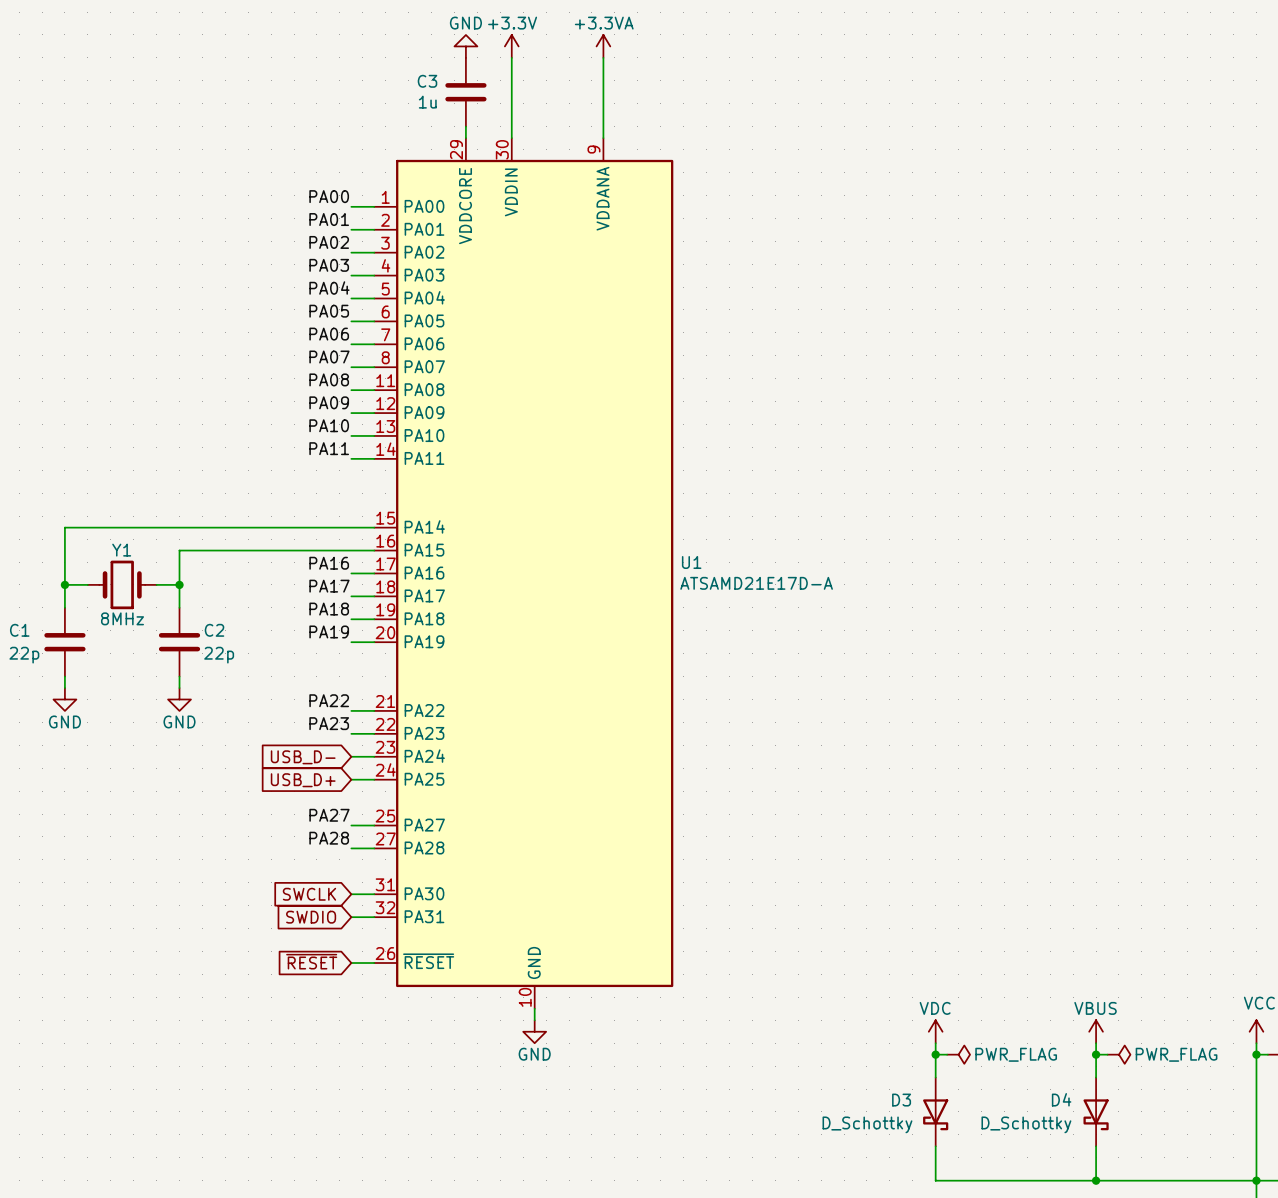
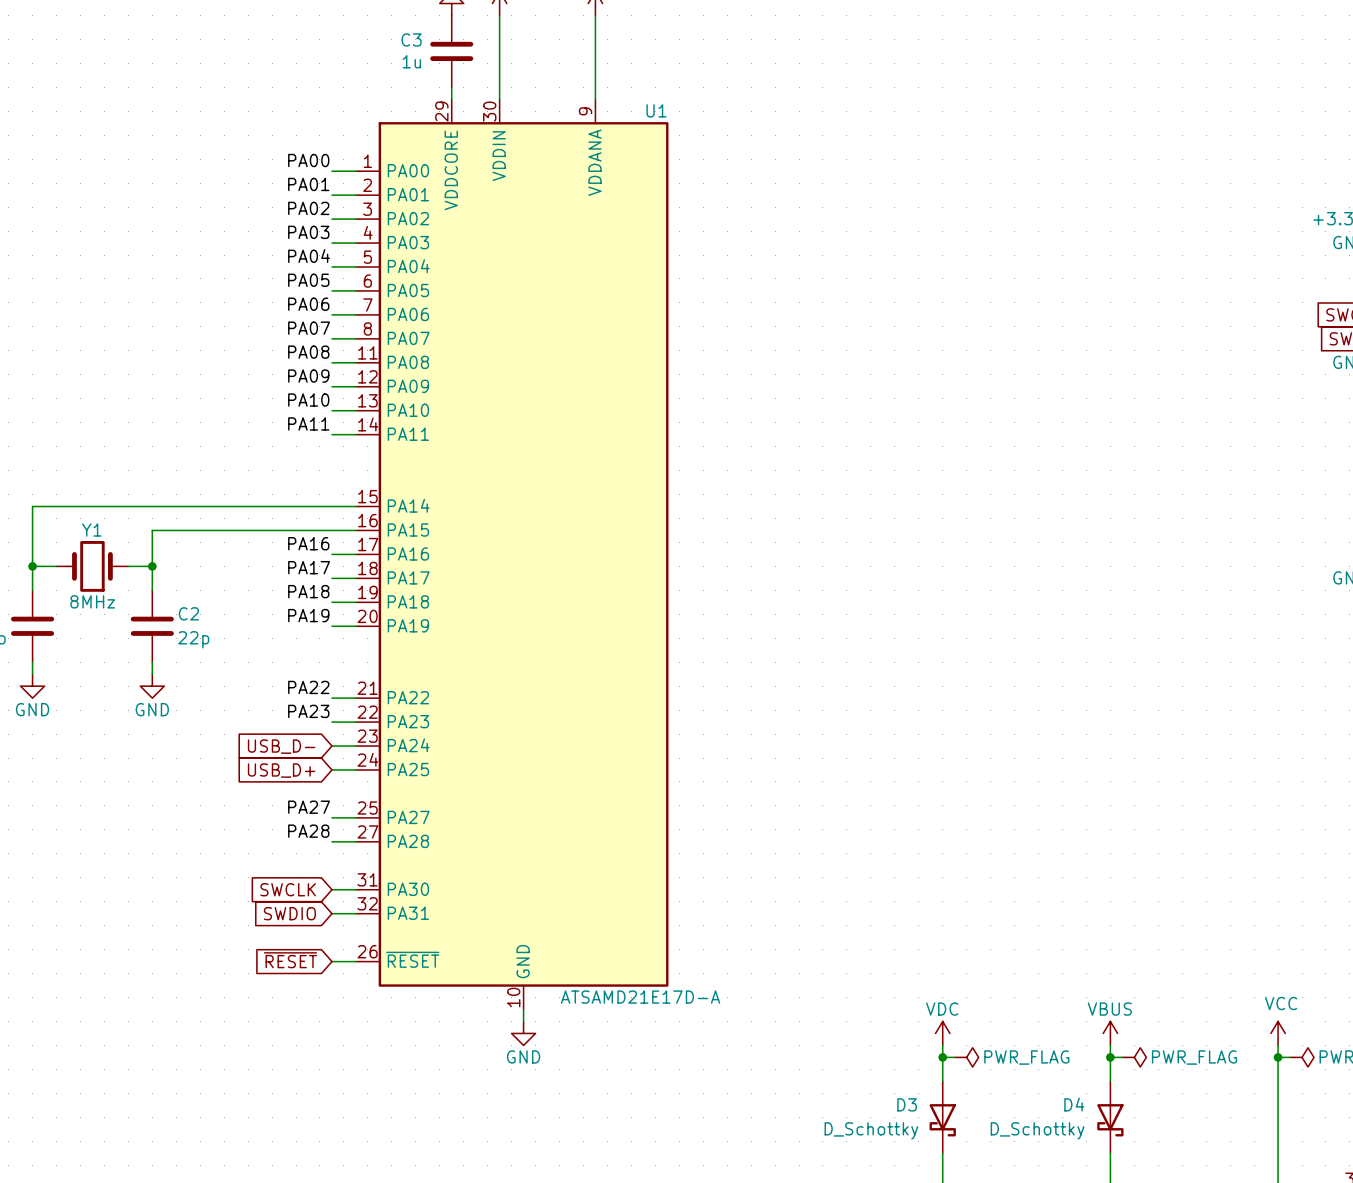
U1 name position: U1 (691, 562) -> U1 (656, 110)
U1 value position: ATSAMD21E17D-A (756, 583) -> ATSAMD21E17D-A (640, 997)

